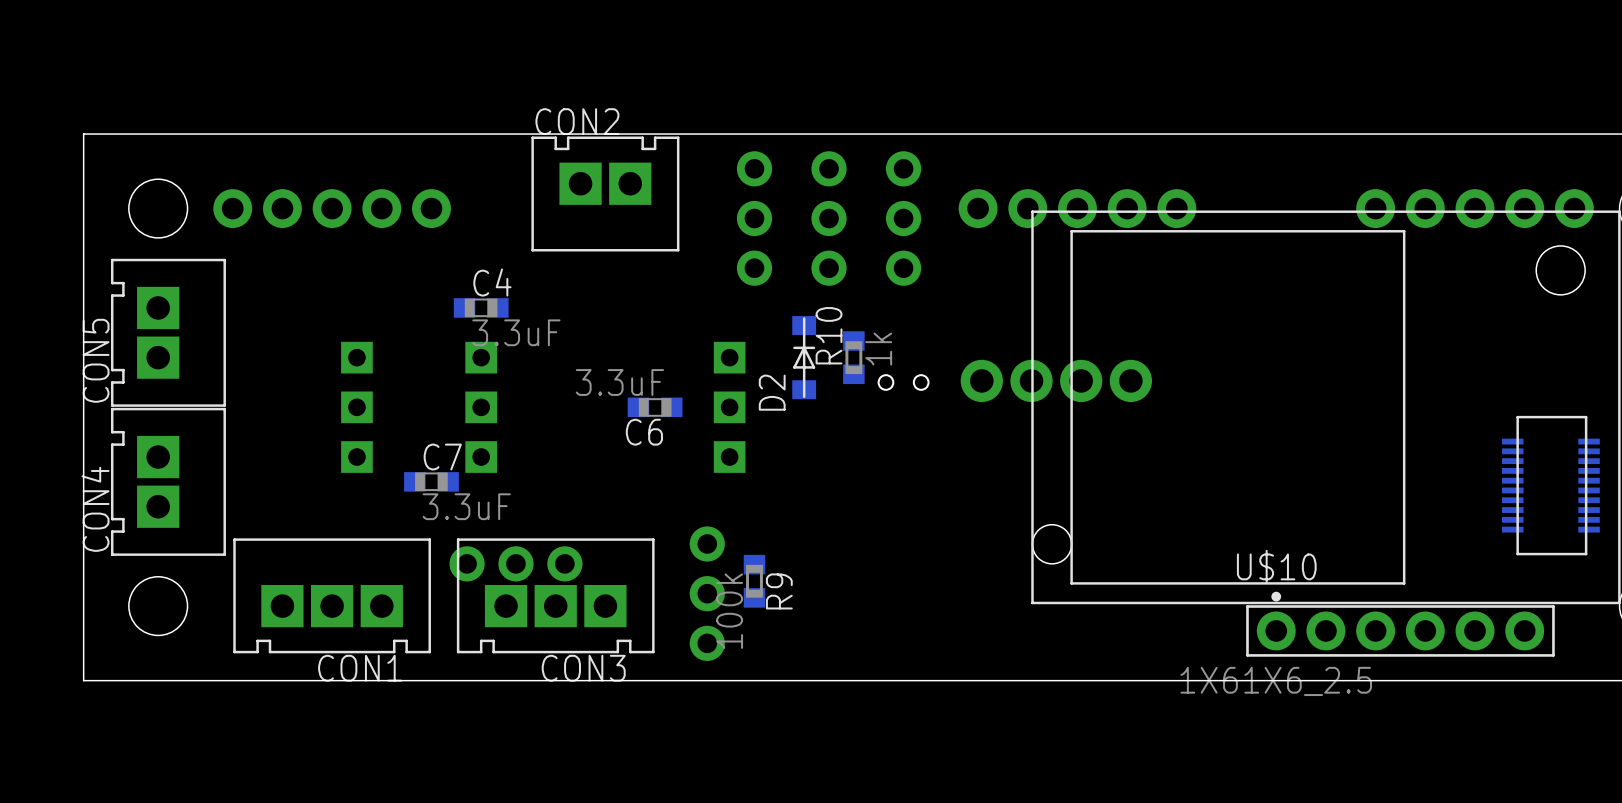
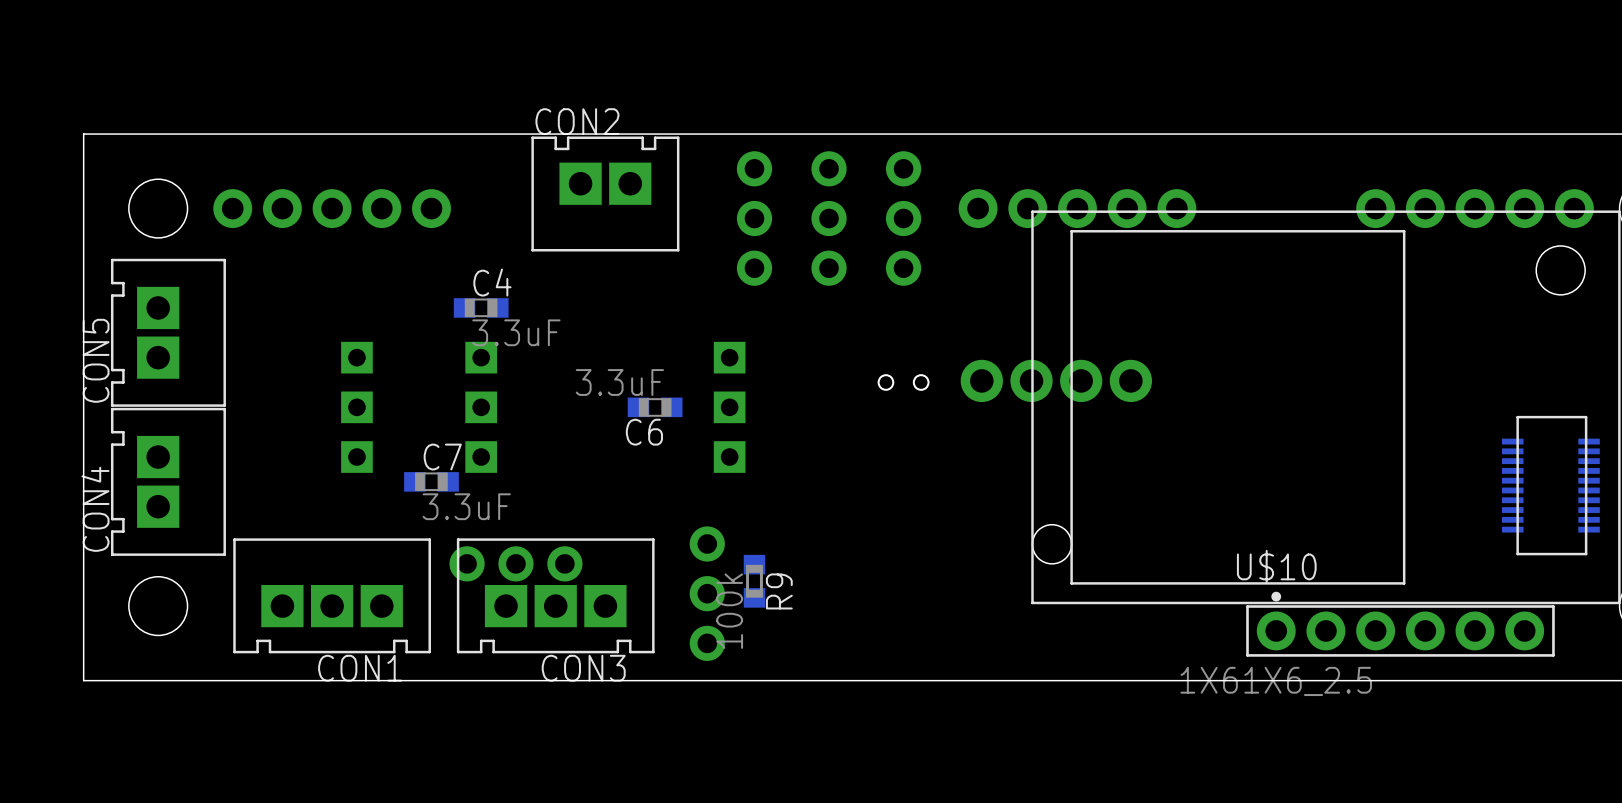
D2: (804, 357) -> none
R10: 1k (853, 357) -> none

